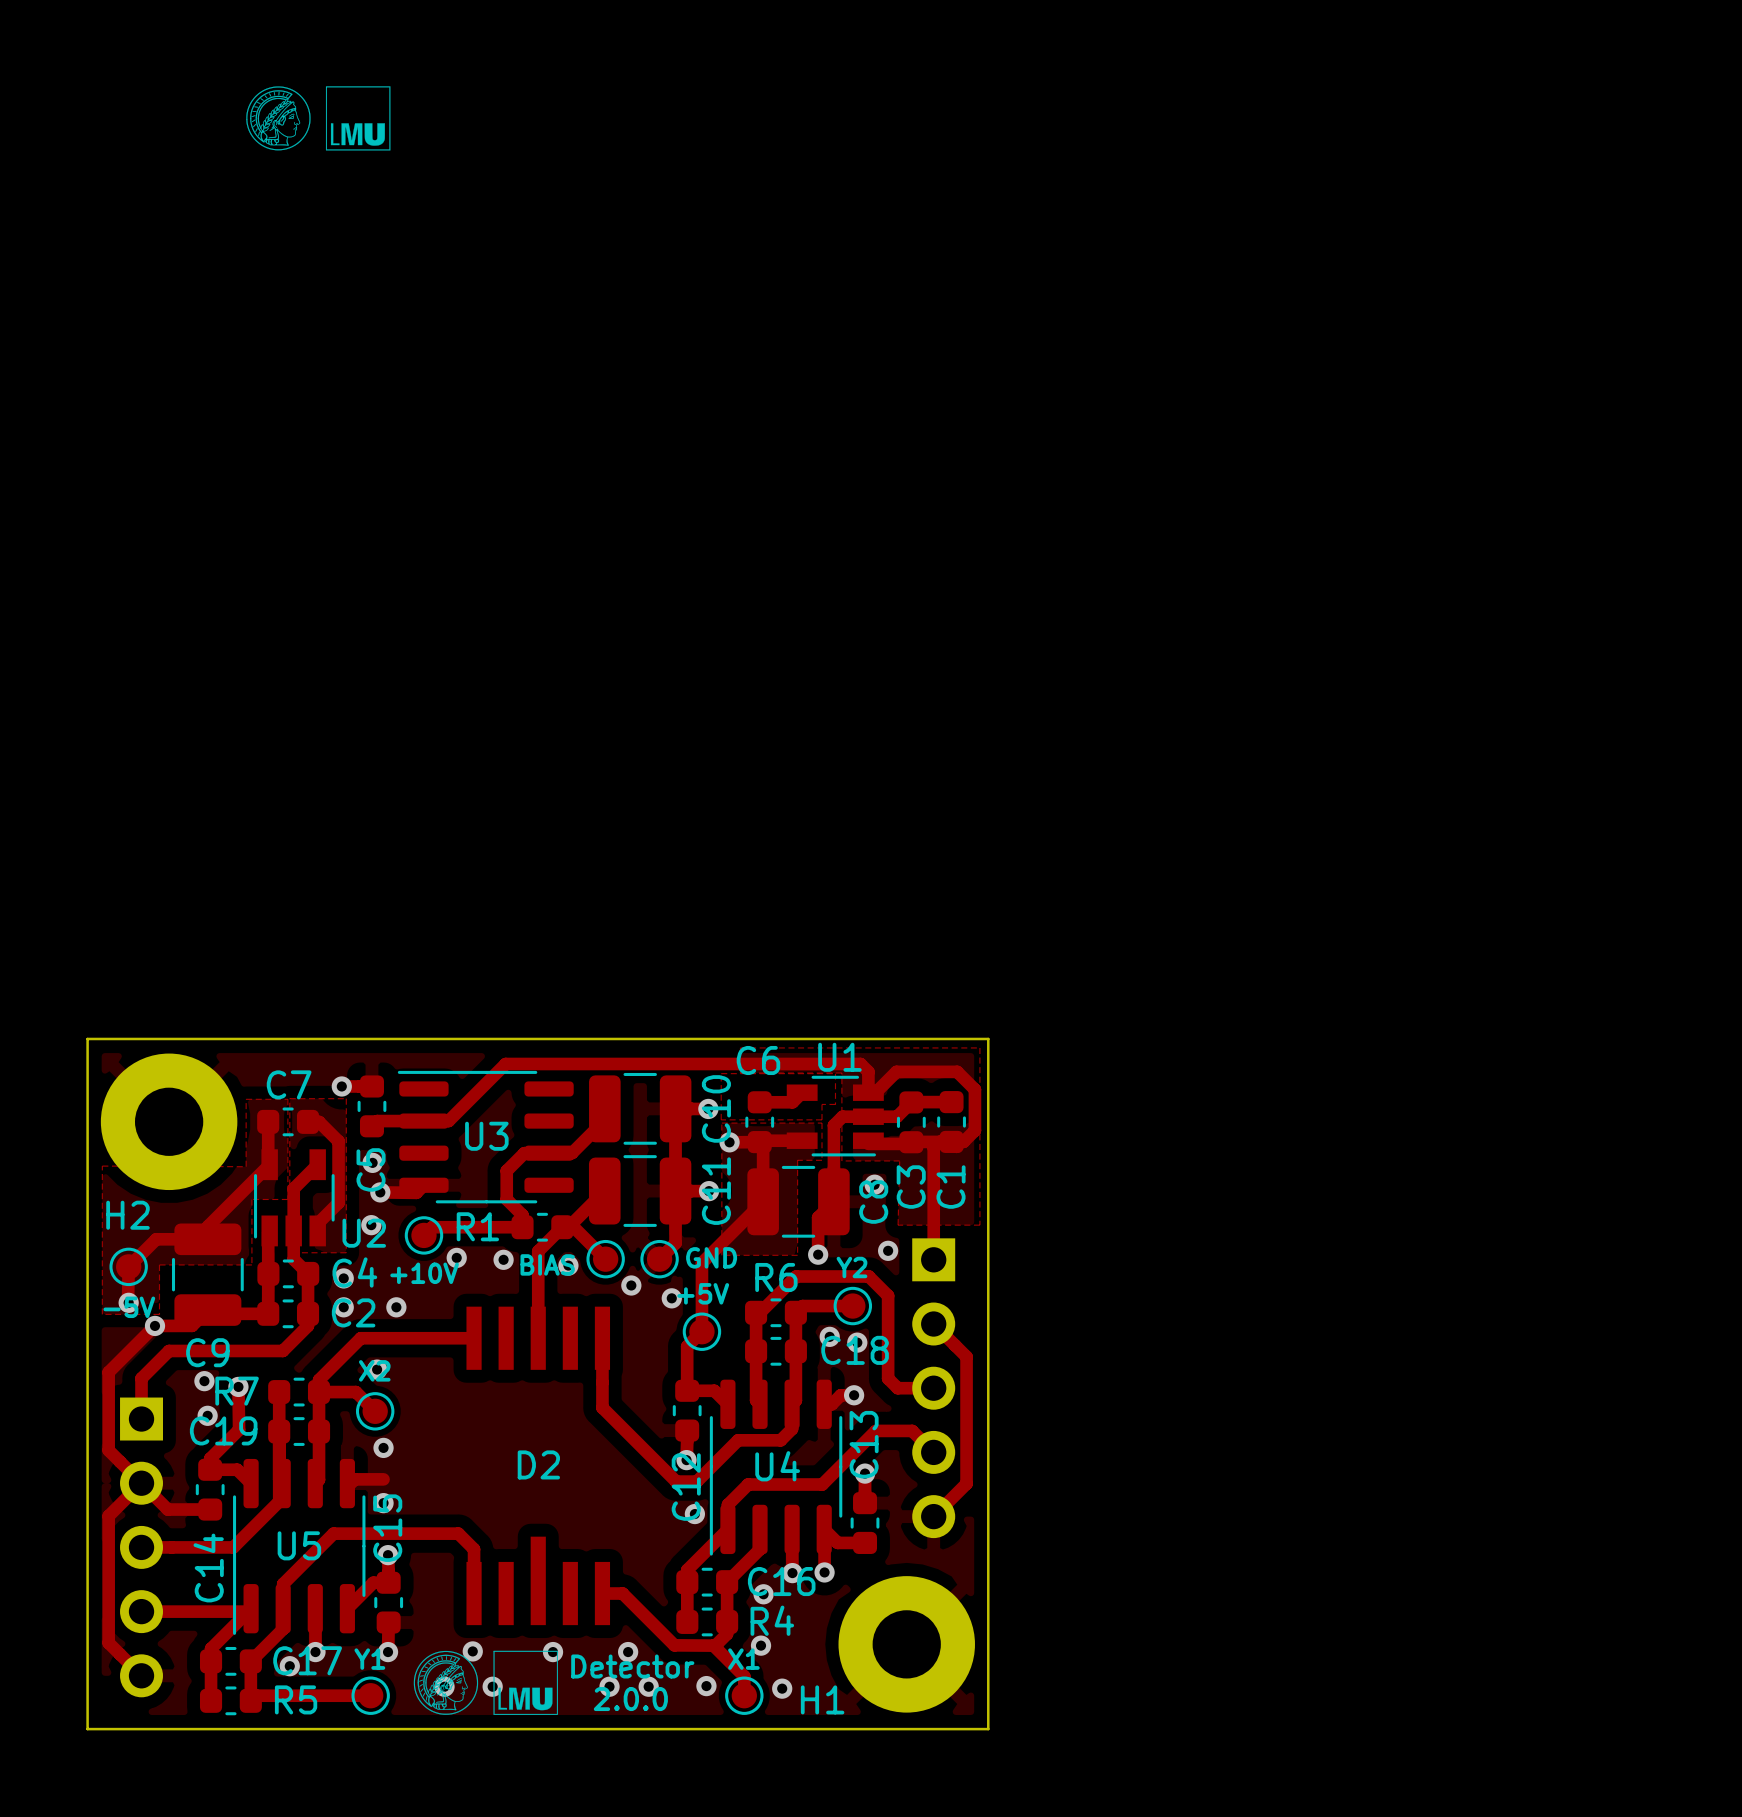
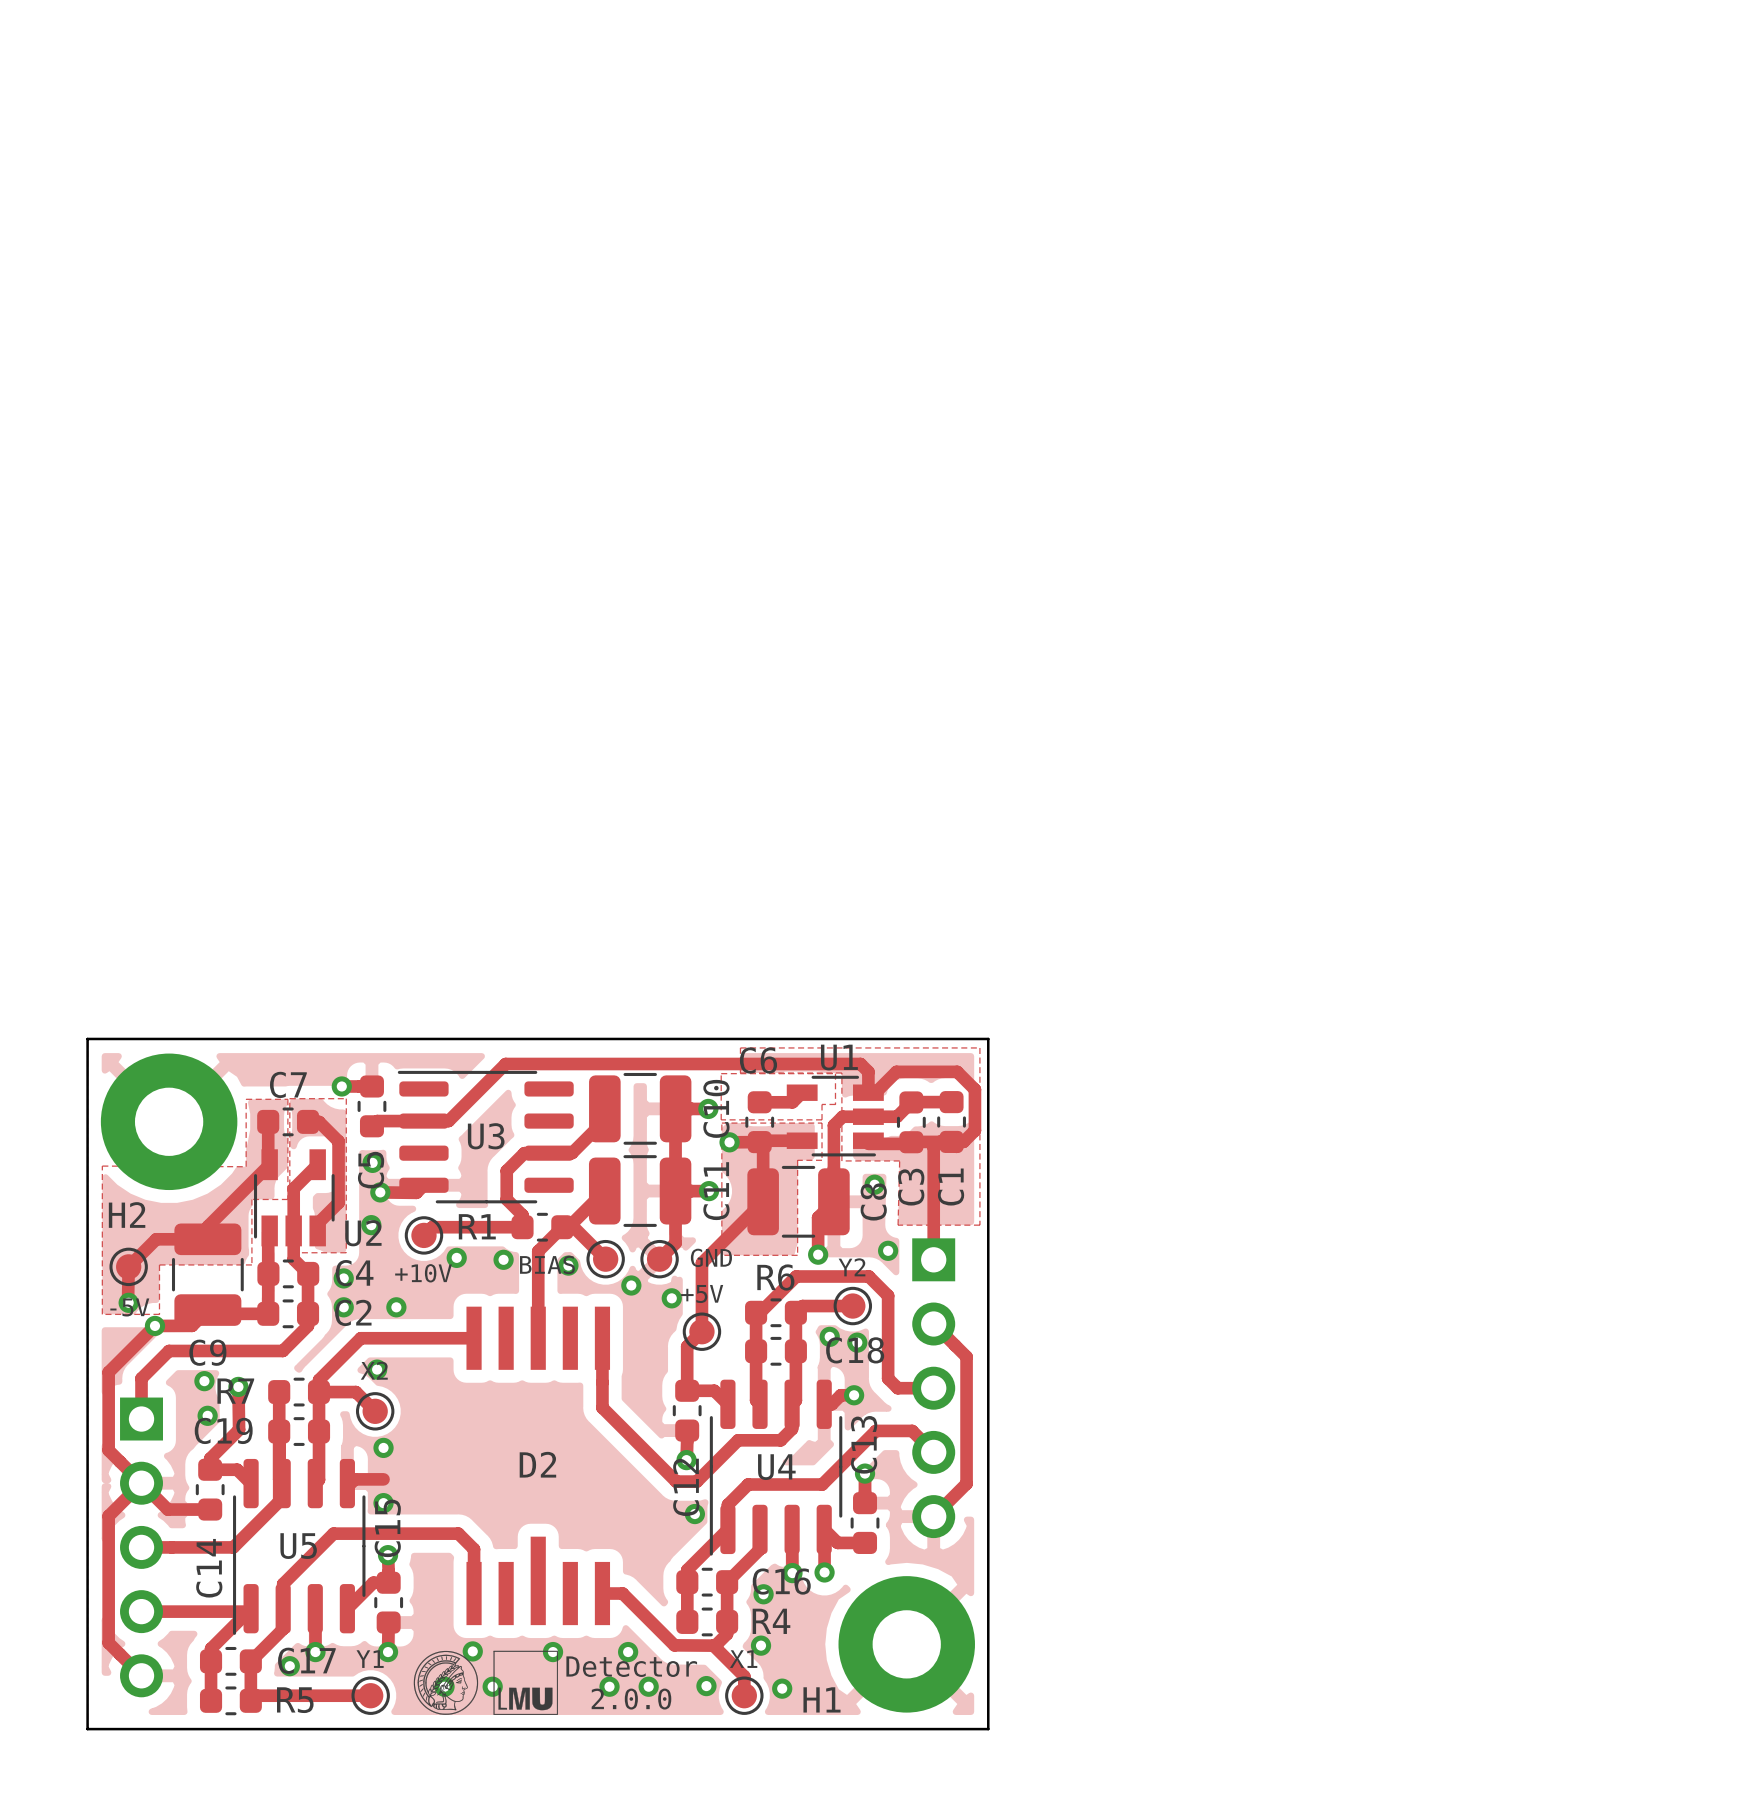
drawing: [246, 86, 391, 151] -> none

